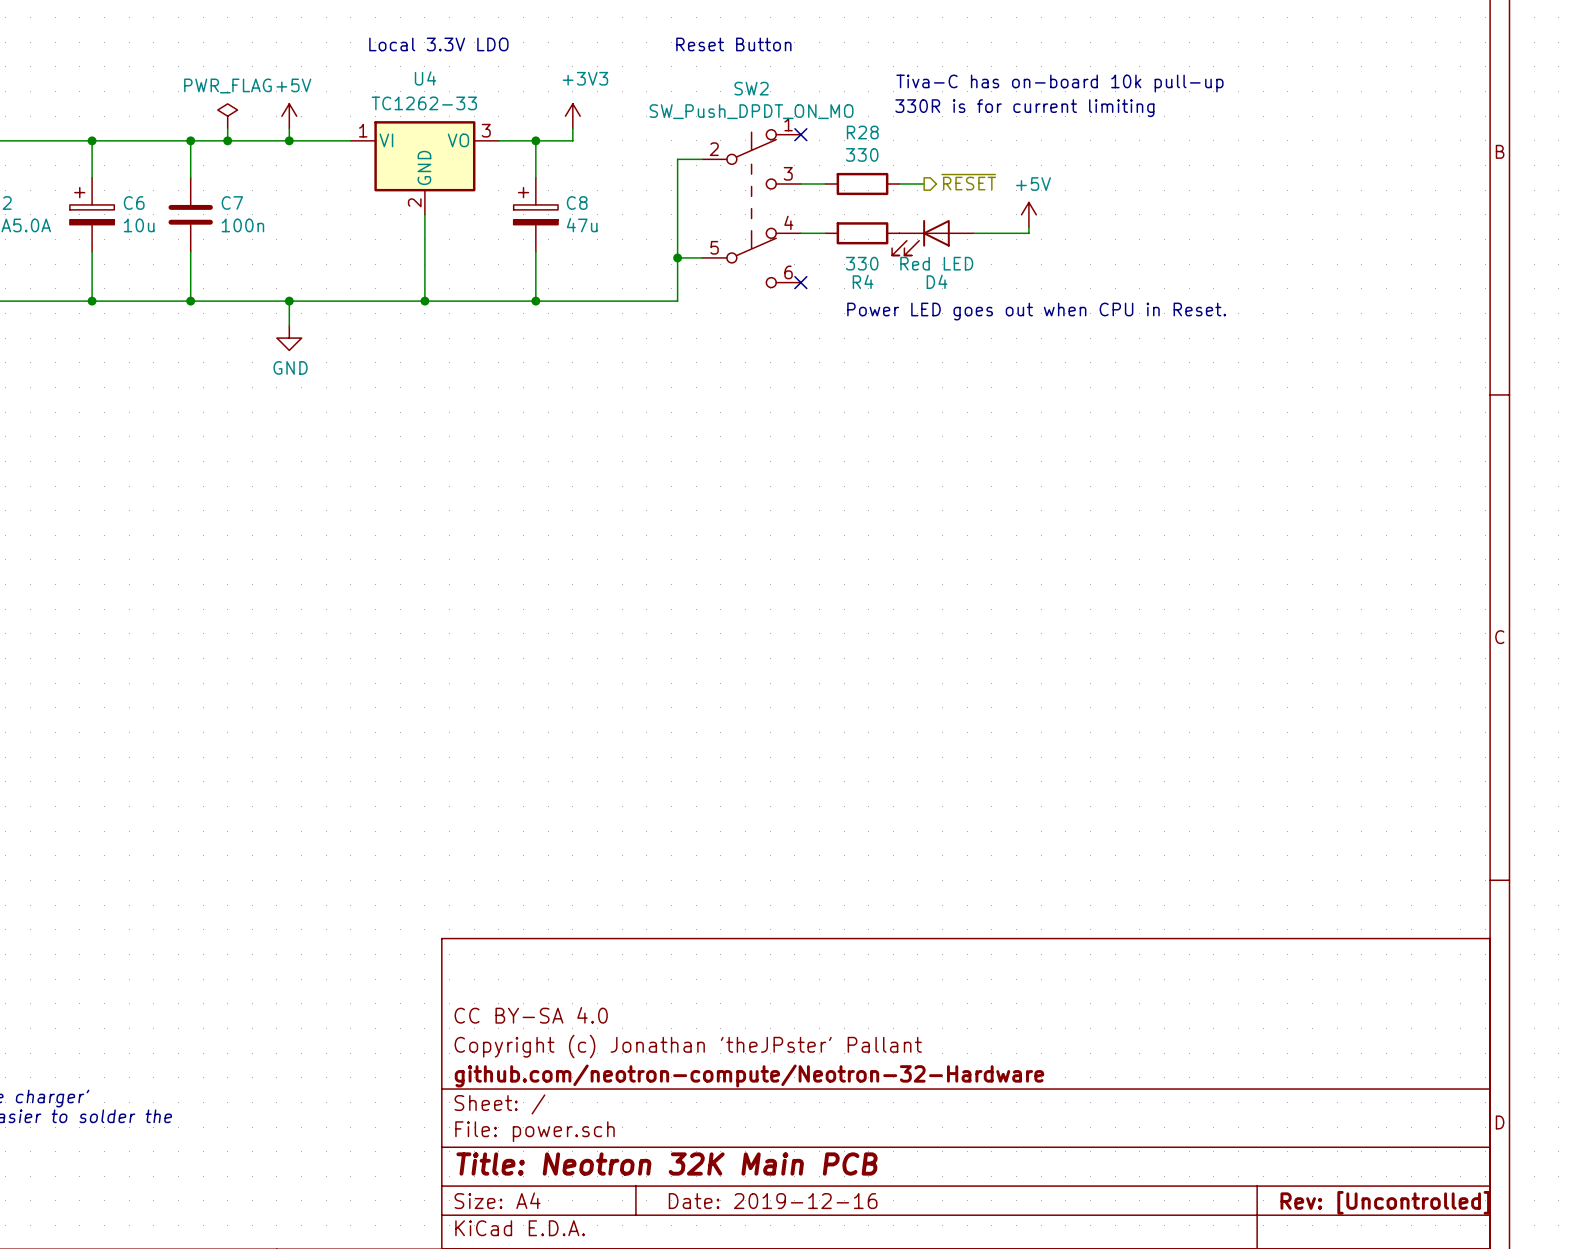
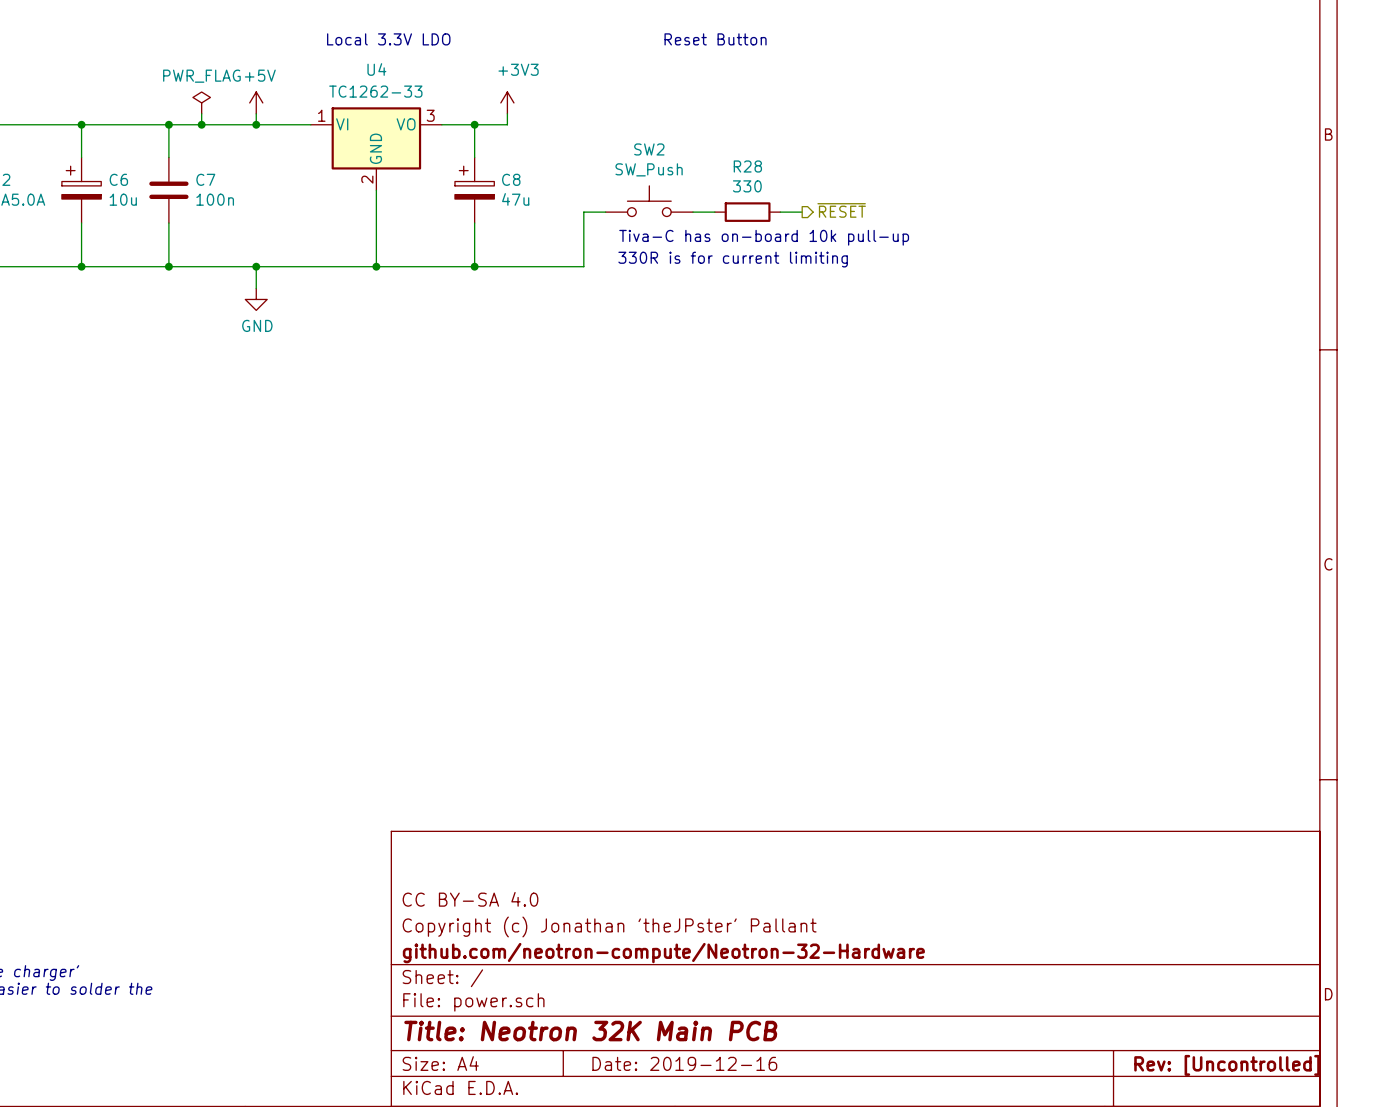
text position: Reset Button (733, 44) -> Reset Button (715, 39)
text: Tiva-C has on-board 10k pull-up (1059, 83) -> none
SW2 name position: SW2 (751, 88) -> SW2 (649, 149)
text: 330R is for current limiting (1024, 108) -> none
SW2 value: SW_Push_DPDT_ON_MO (751, 111) -> SW_Push (649, 169)
SW2 symbol: [702, 129, 801, 288] -> [605, 185, 694, 217]
no-connect mark: (800, 134) -> none
wire: (702, 159) (677, 159) (677, 301) (659, 301) -> (605, 212) (583, 212) (583, 266)
hierarchical label position: ~{RESET} (968, 182) -> ~{RESET} (841, 210)
wire: (800, 184) (825, 184) -> (693, 212) (714, 212)
R28 position: (862, 184) -> (747, 212)
wire: (899, 184) (924, 184) -> (780, 212) (802, 212)
power symbol: +5V (1028, 214) -> none
wire: (1028, 227) (1028, 233) (973, 233) -> none
wire: (800, 233) (825, 233) -> none
R4: 330 (862, 233) -> none
D4: Red LED (932, 237) -> none
wire: (677, 257) (702, 257) -> none
junction: (677, 257) -> none
text: none -> Tiva-C has on-board 10k pull-up (764, 237)
no-connect mark: (800, 282) -> none
text: none -> 330R is for current limiting (733, 259)
text: Power LED goes out when CPU in Reset. (1036, 311) -> none

